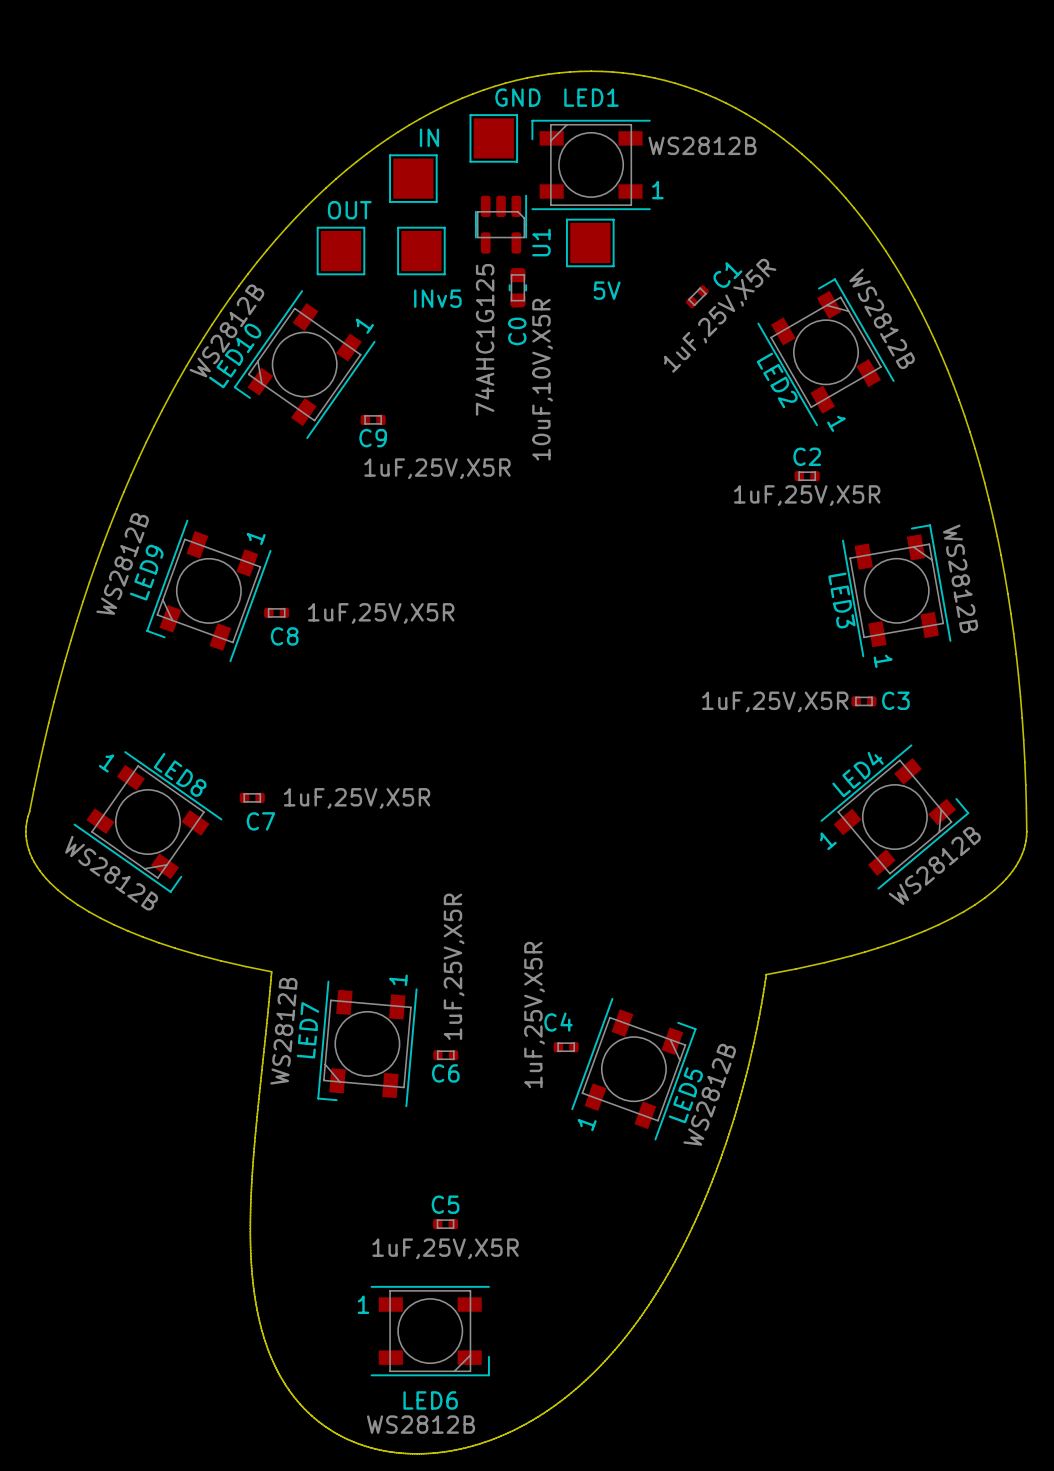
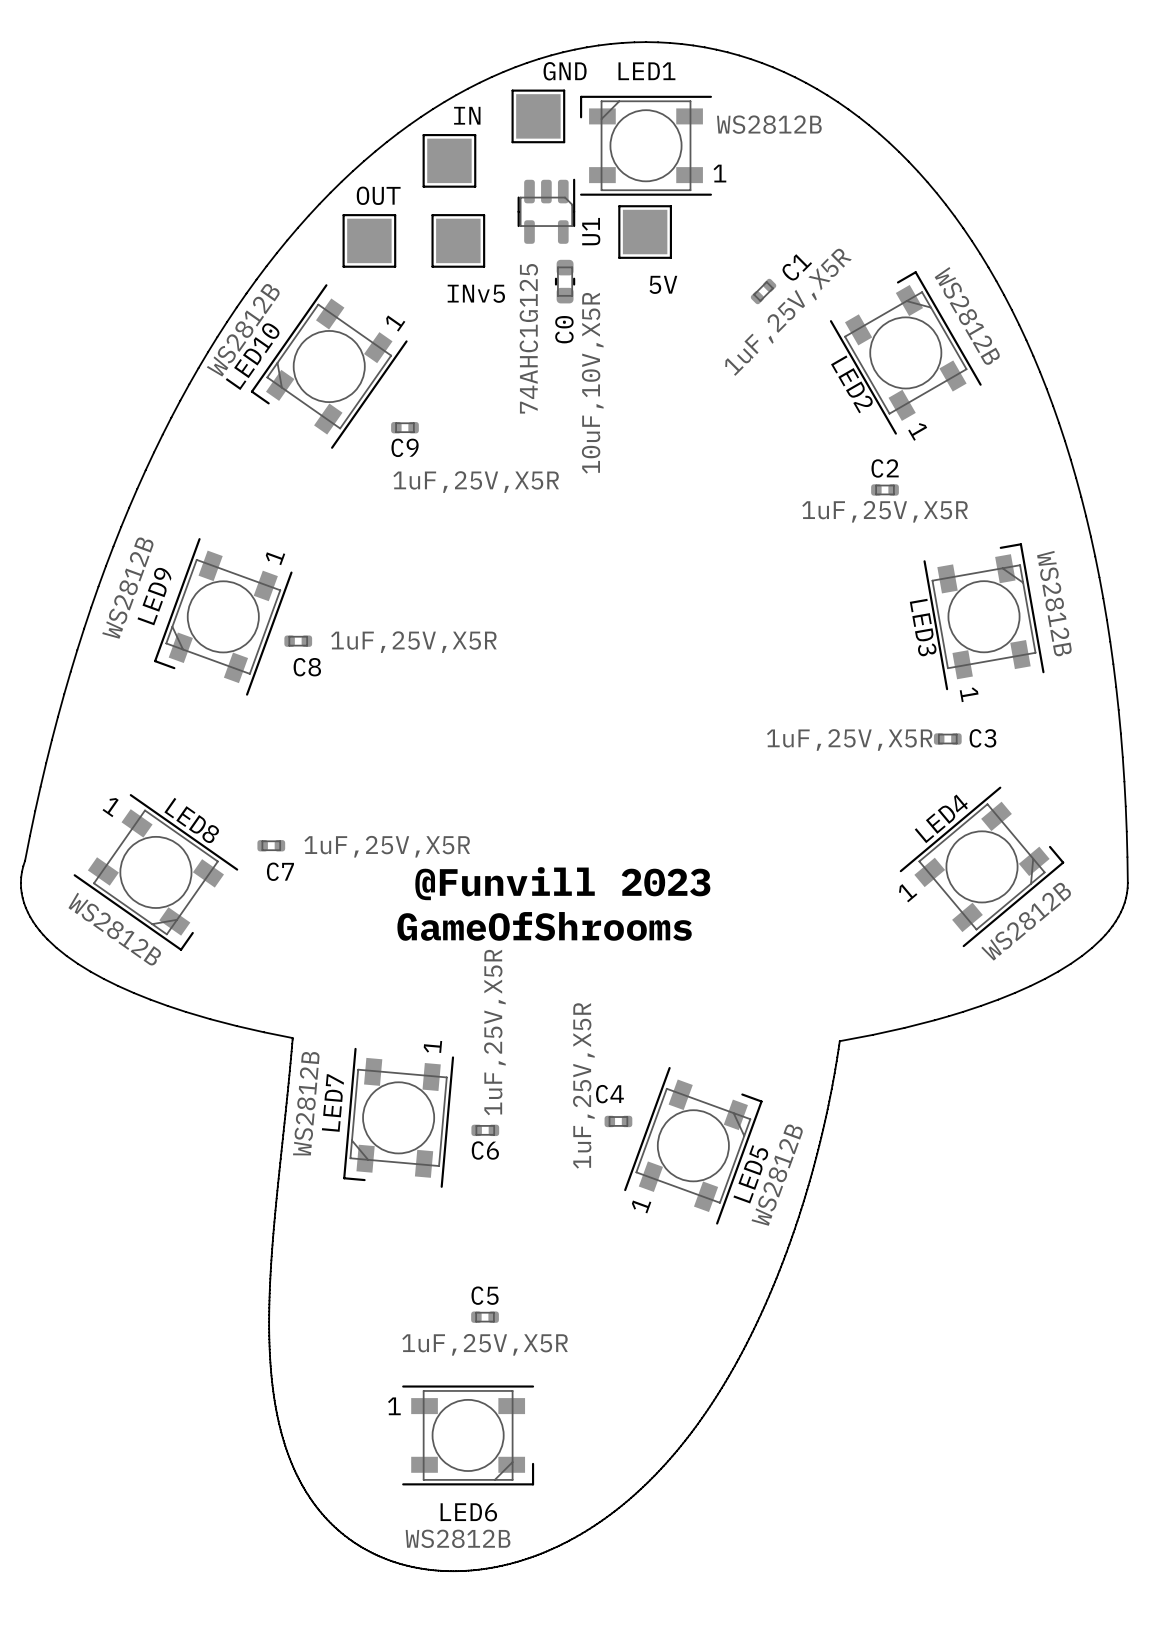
text: none -> @Funvill 2023 (562, 883)
text: none -> GameOfShrooms (544, 926)

